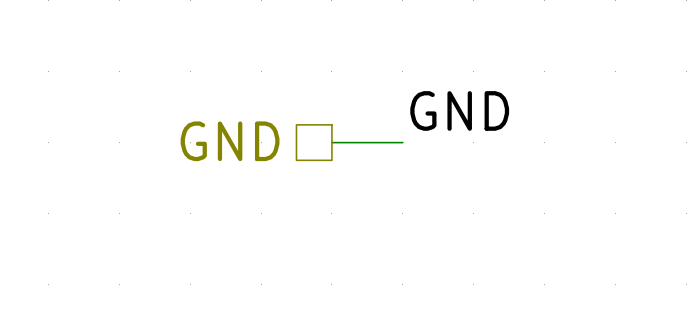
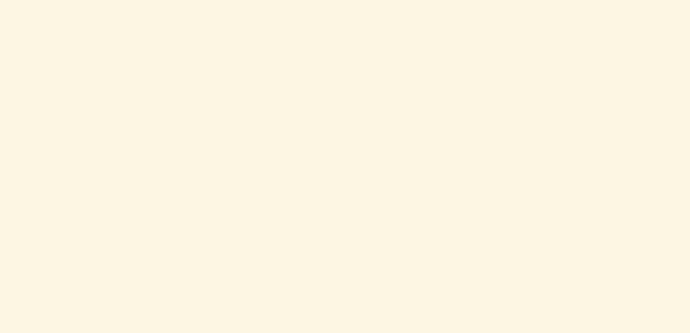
label: GND (459, 110) -> none
hierarchical label: GND (230, 141) -> none
wire: (331, 142) (402, 142) -> none

